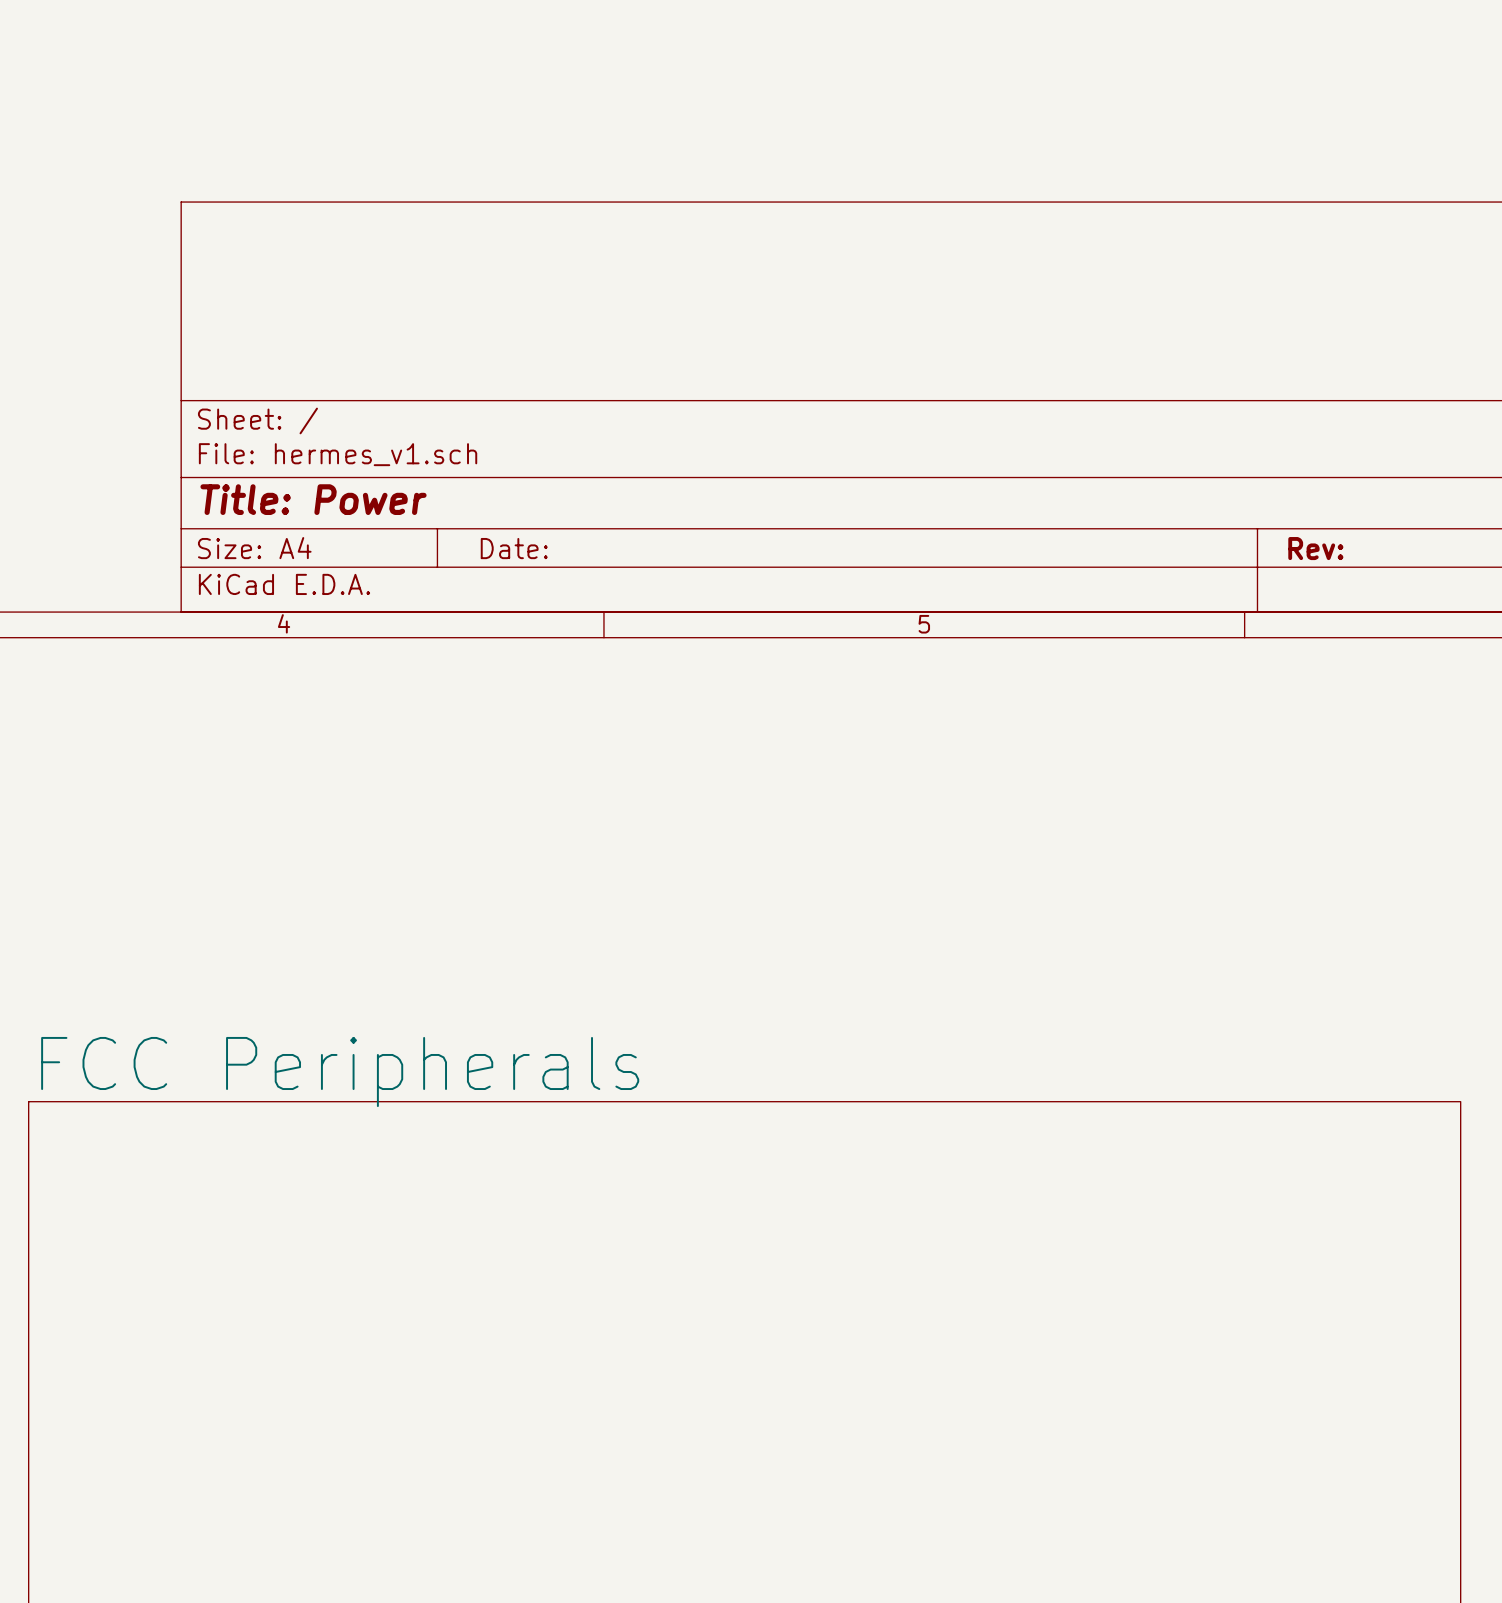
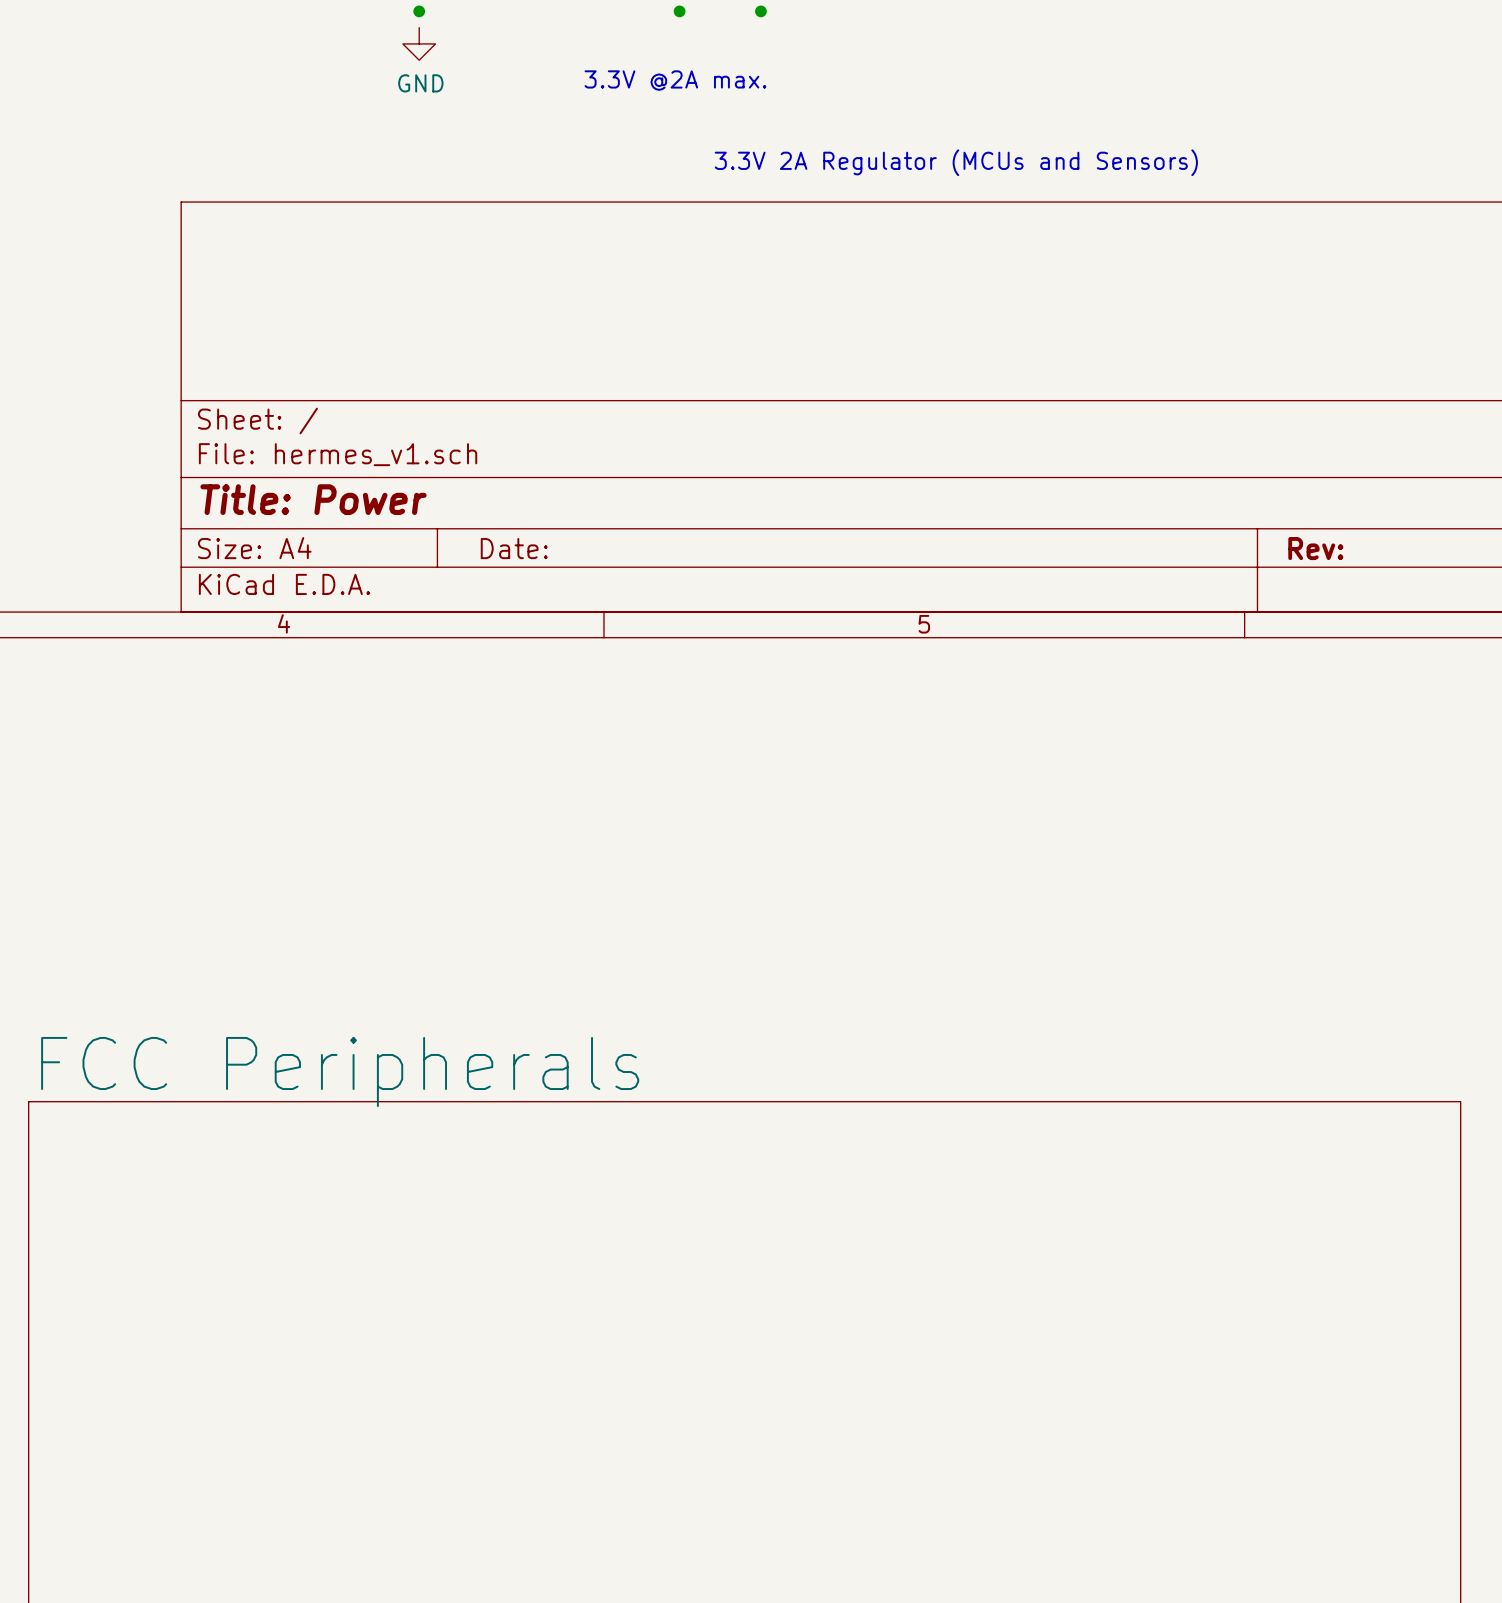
junction: none -> (419, 11)
junction: none -> (679, 11)
junction: none -> (760, 11)
power symbol: none -> GND (419, 43)
text: none -> 3.3V @2A max. (675, 80)
text: none -> 3.3V 2A Regulator (MCUs and Sensors) (956, 162)

